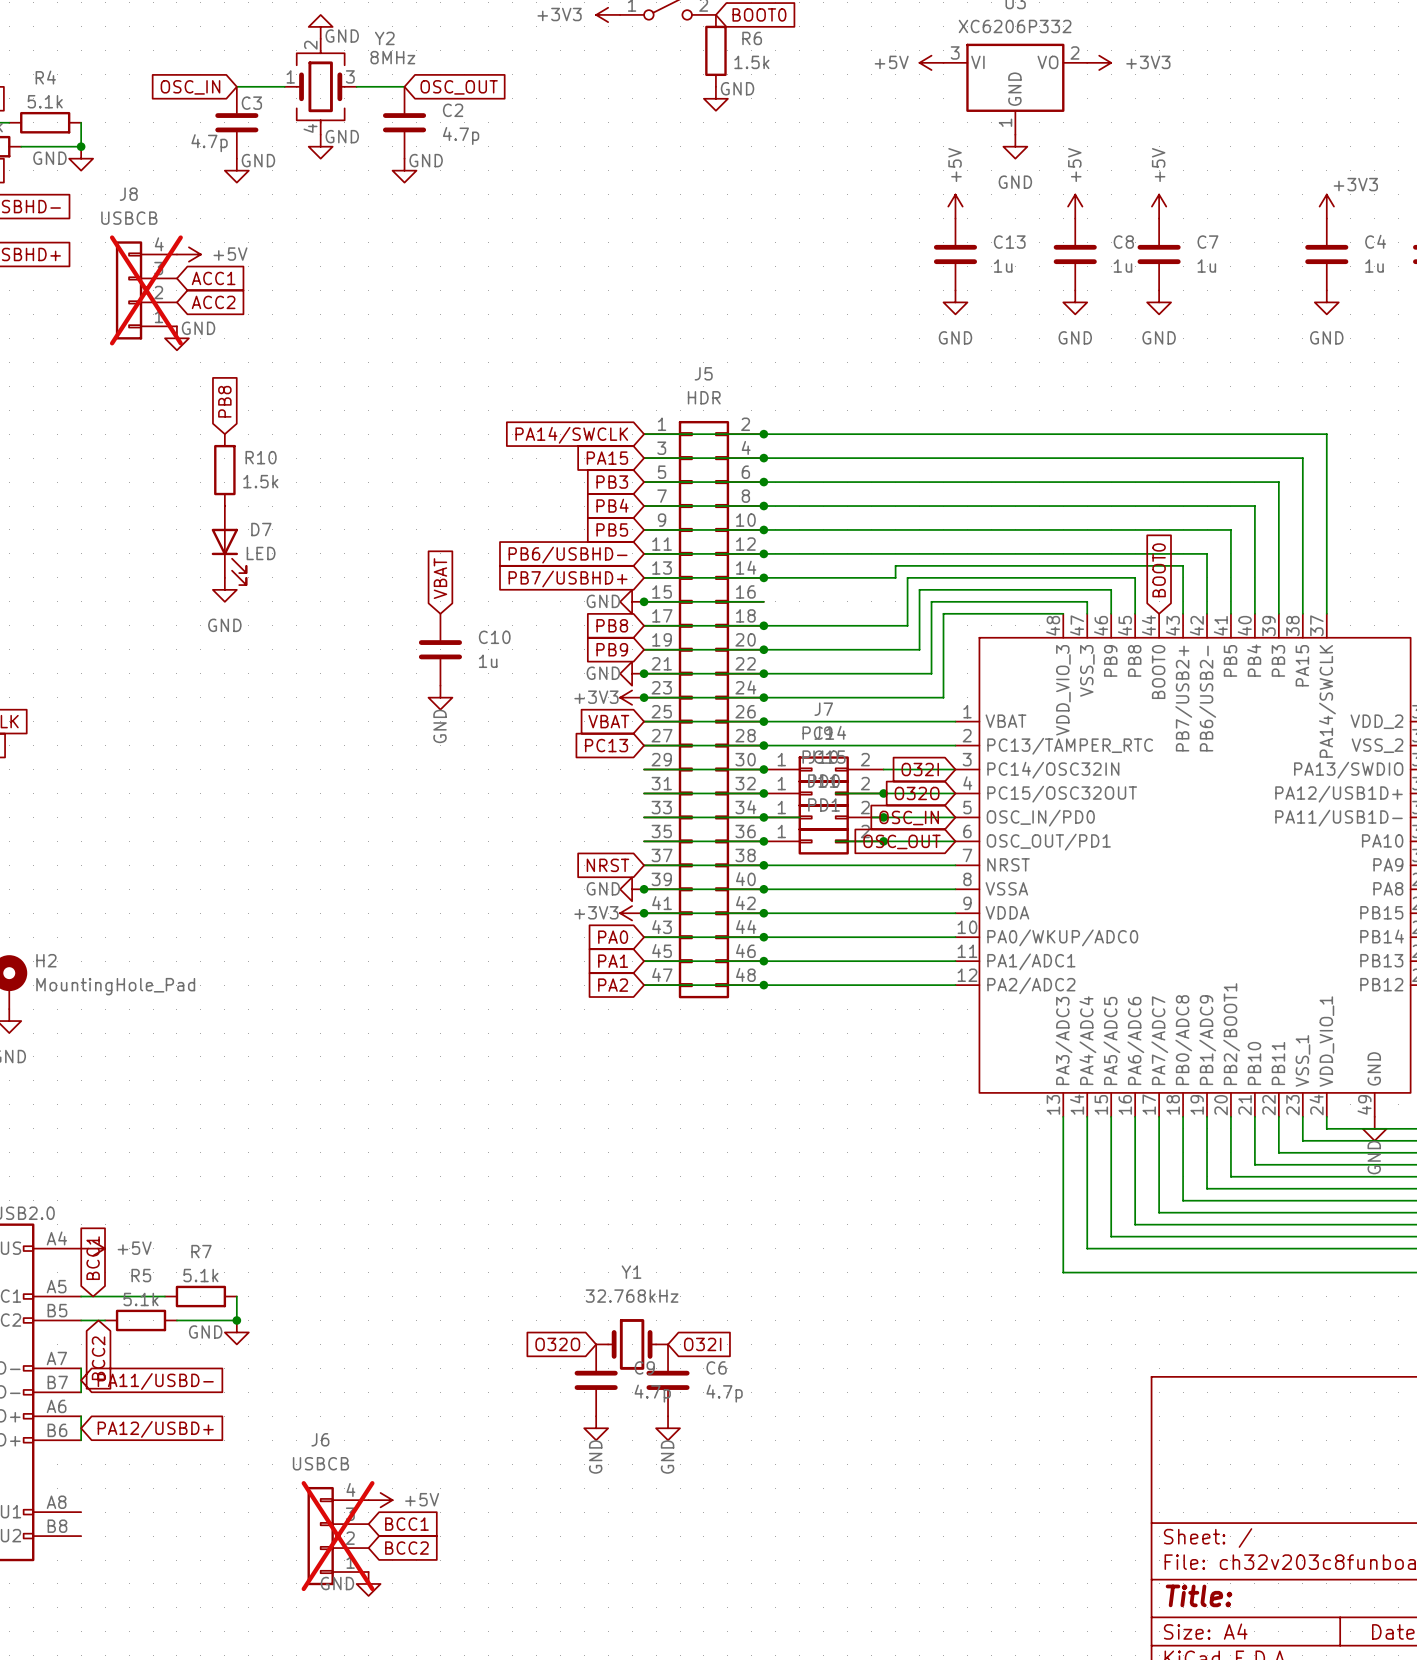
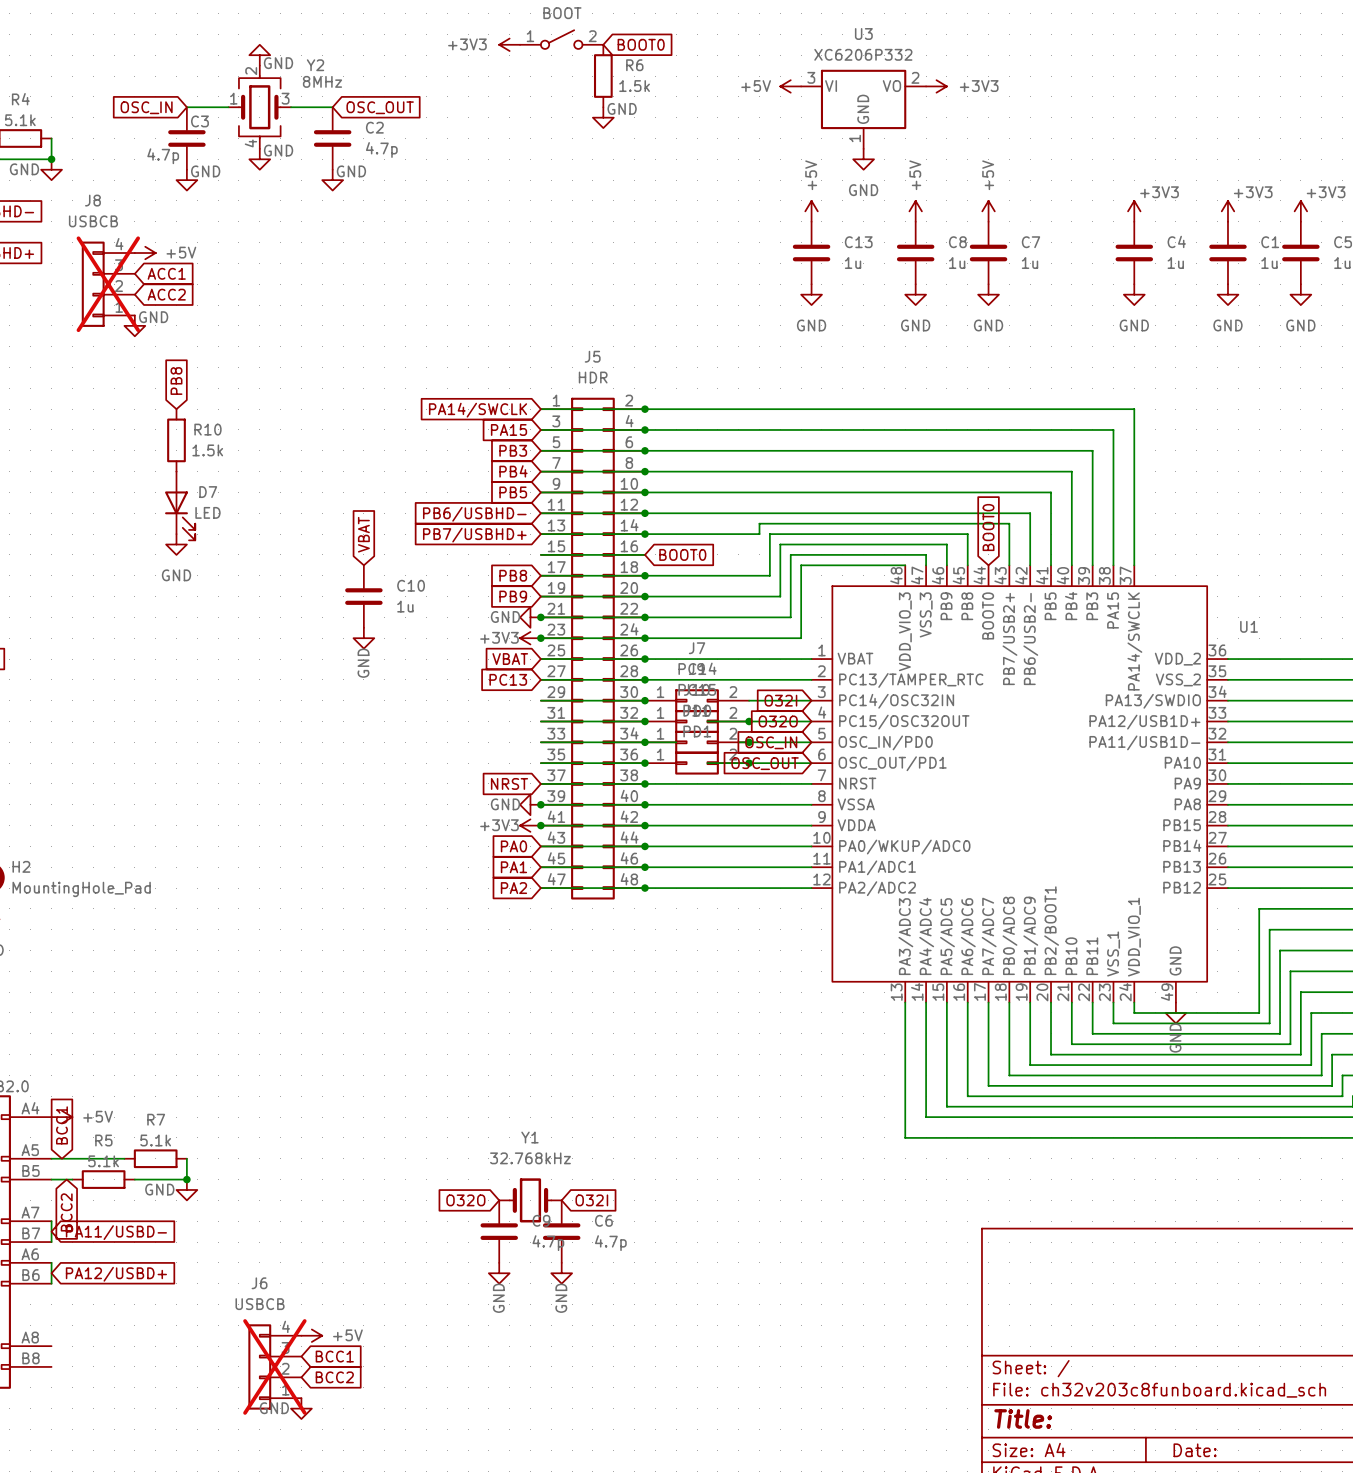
power symbol: GND (632, 601) -> none
junction: (644, 601) -> none
global label: none -> BOOT0 (682, 554)

